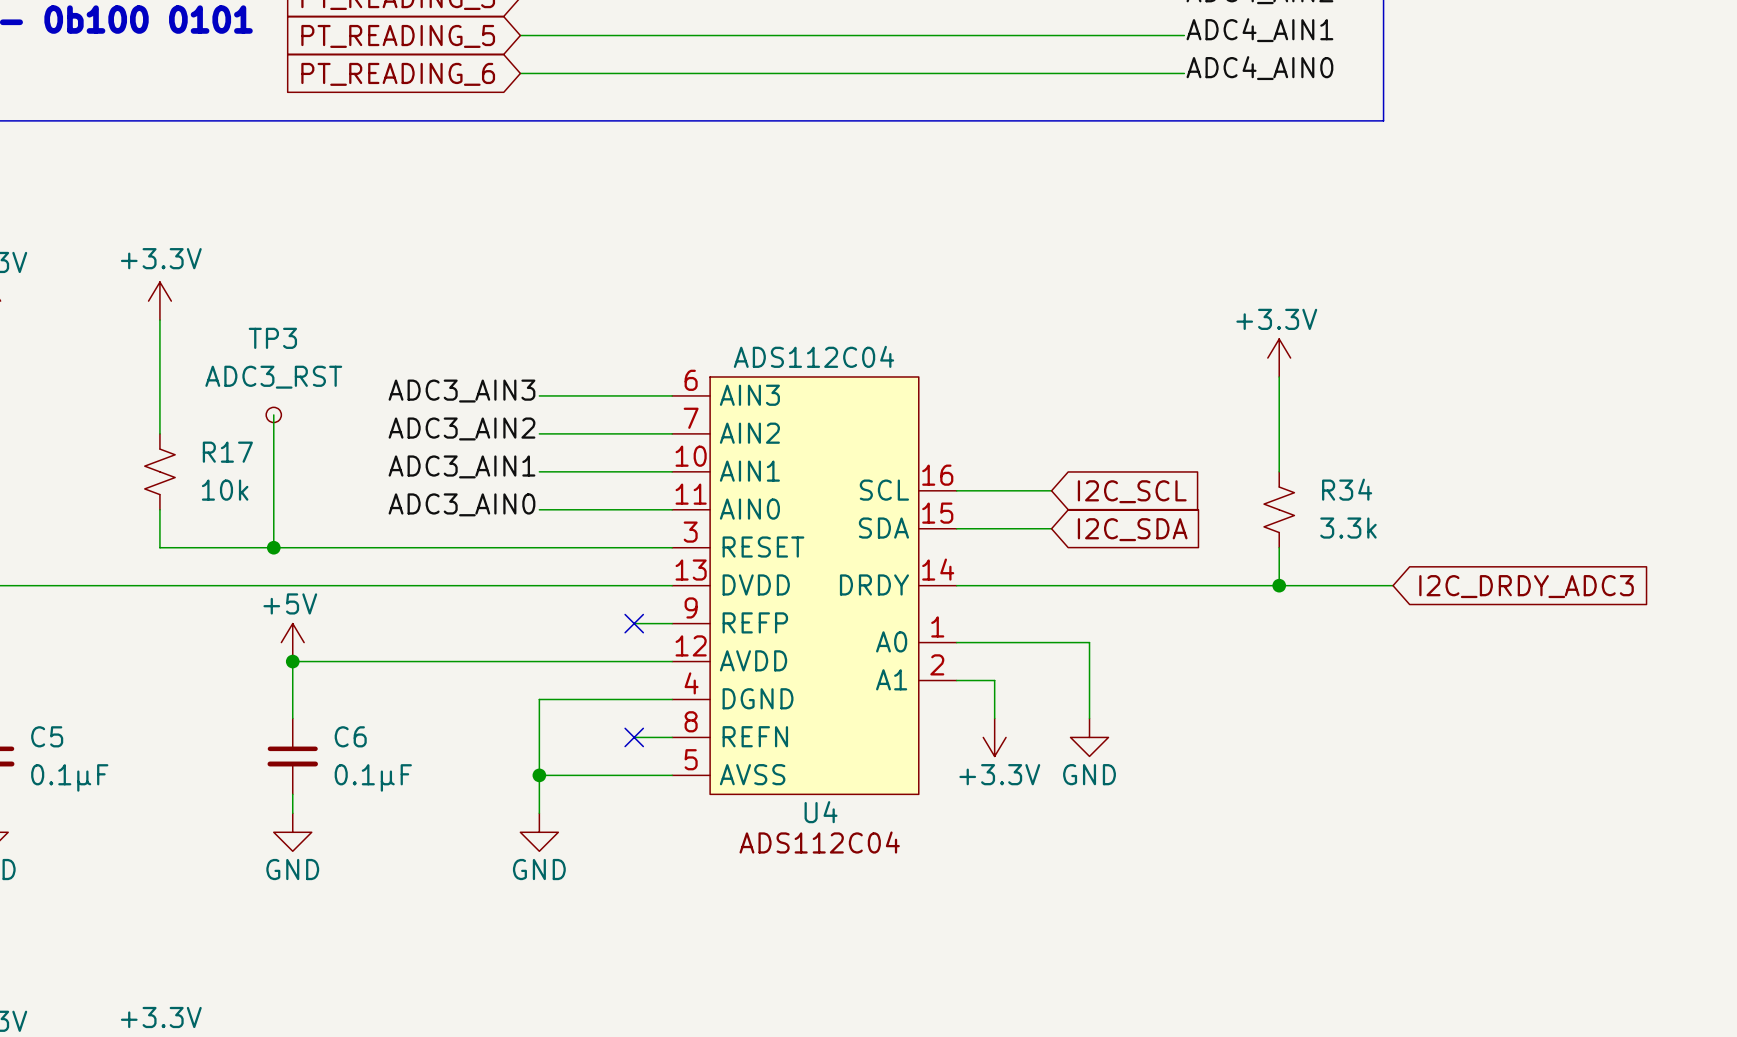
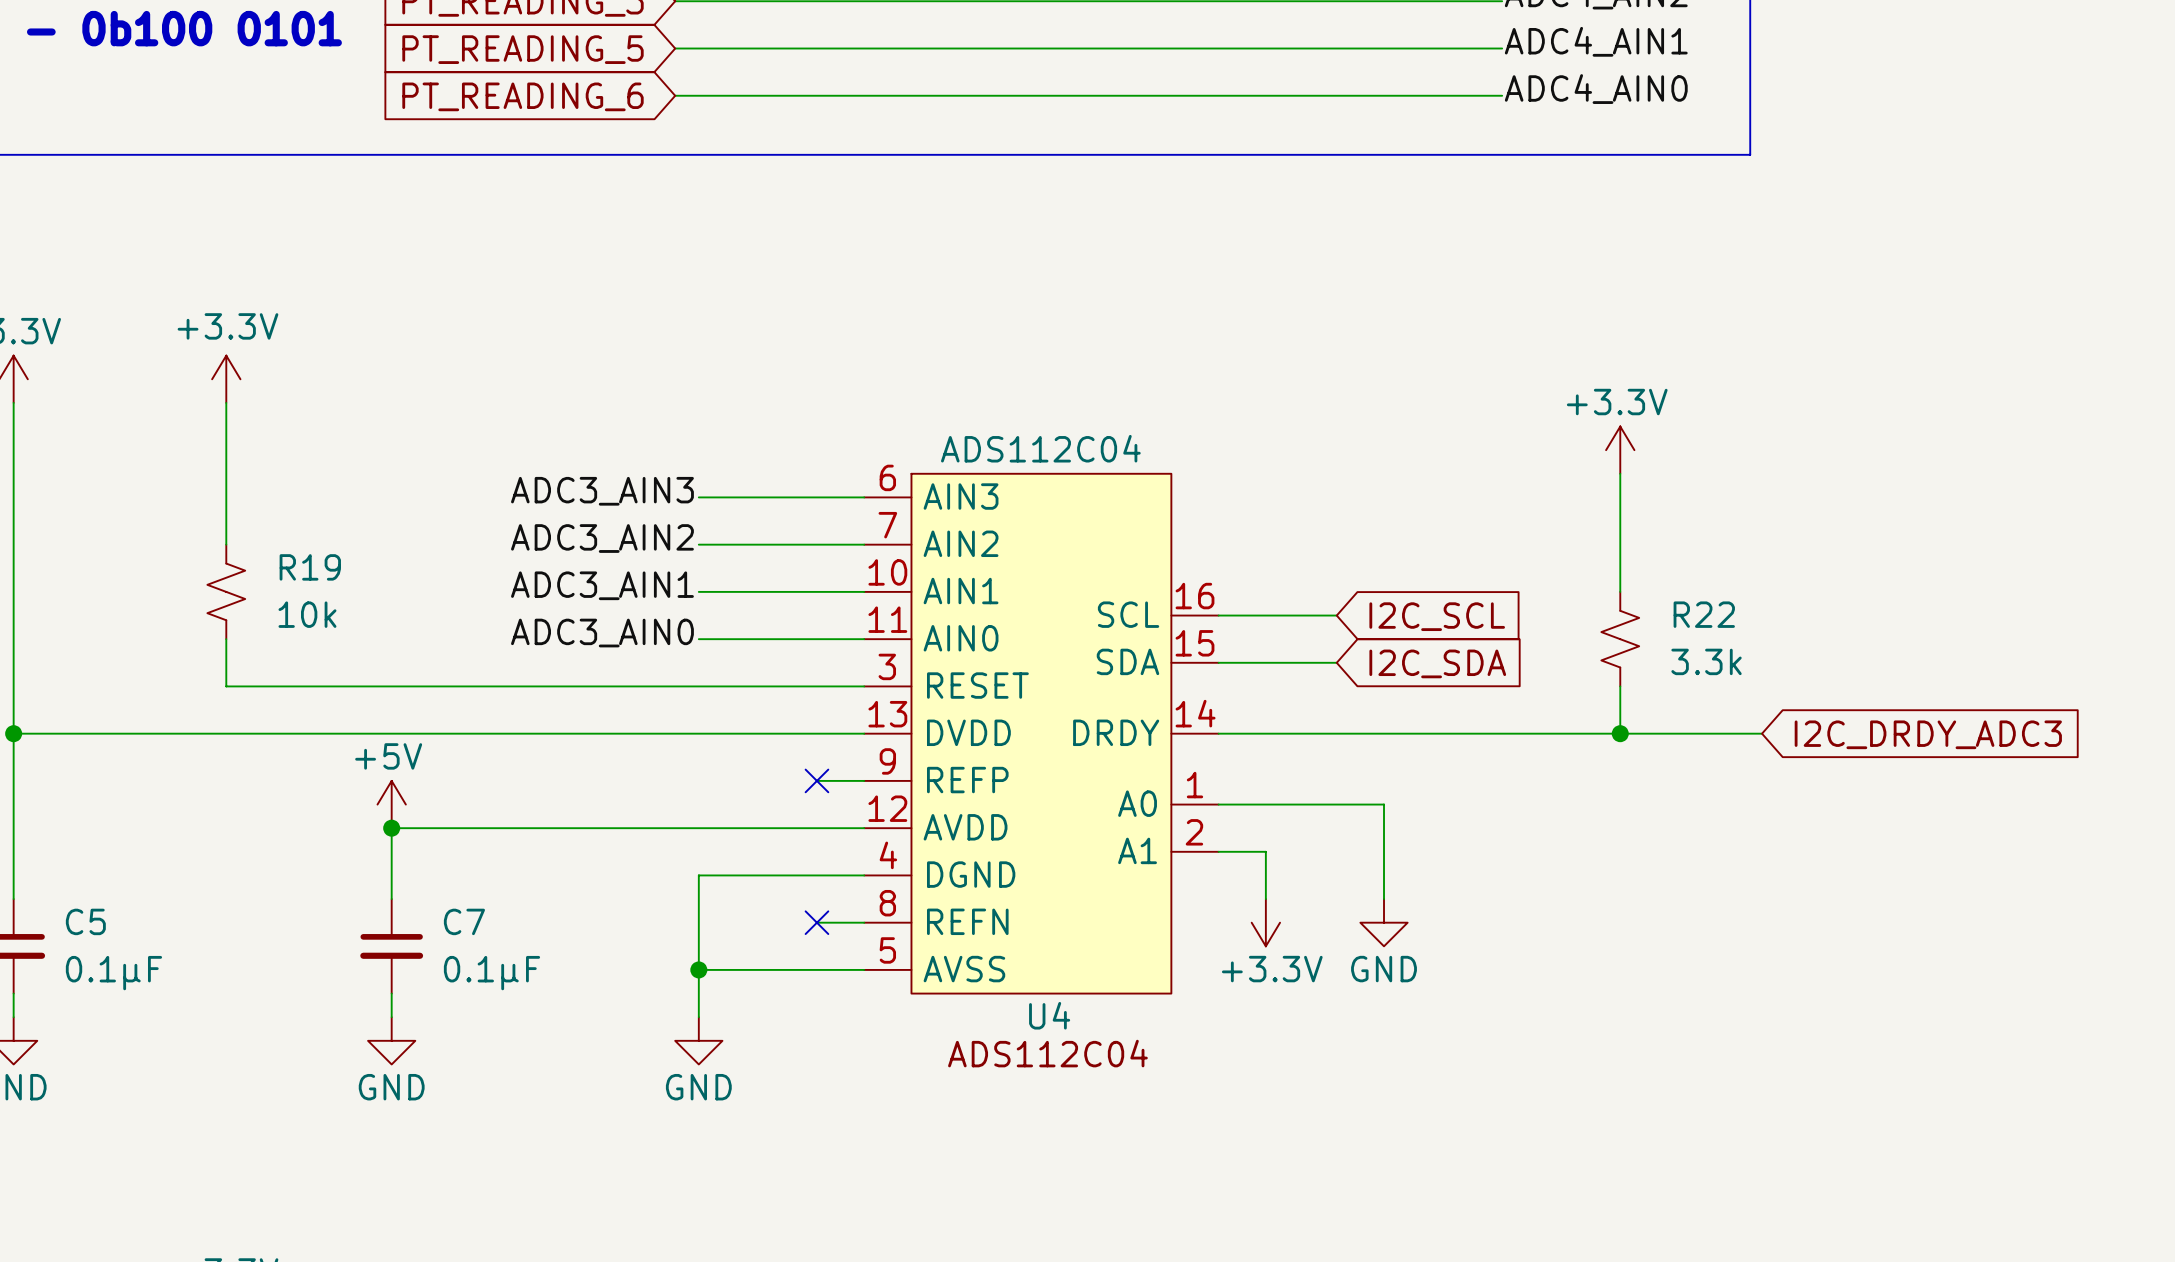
wire: (273, 414) (273, 547) -> none
TP3: ADC3_RST (273, 414) -> none
R17 name: R17 (227, 452) -> R19 (310, 567)
R34 name: R34 (1347, 489) -> R22 (1704, 614)
junction: (273, 547) -> none
C6 name: C6 (350, 736) -> C7 (464, 921)

